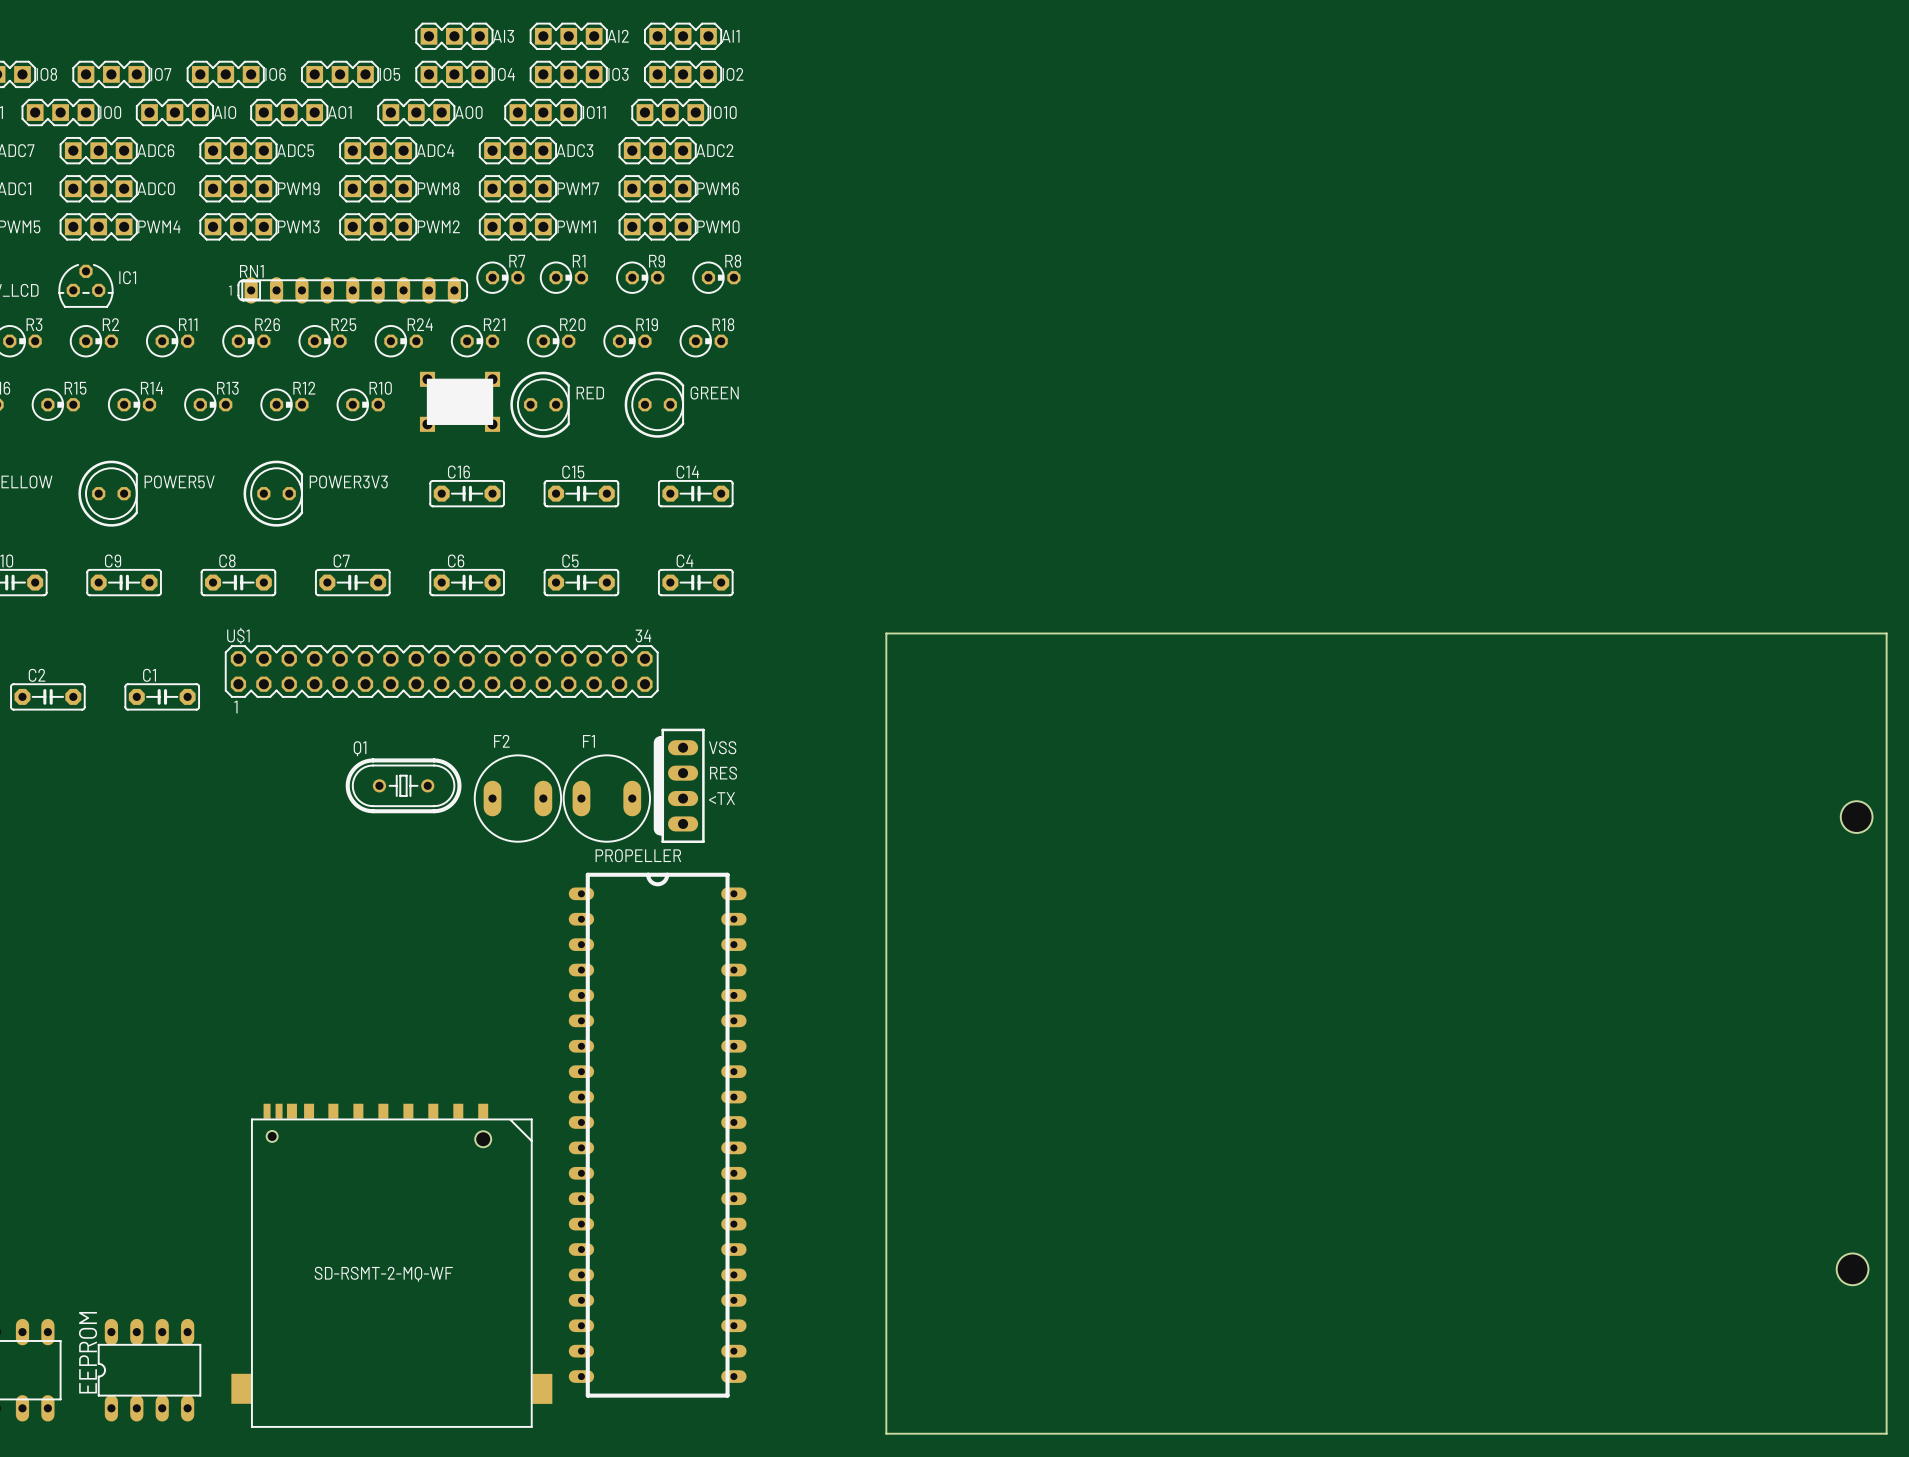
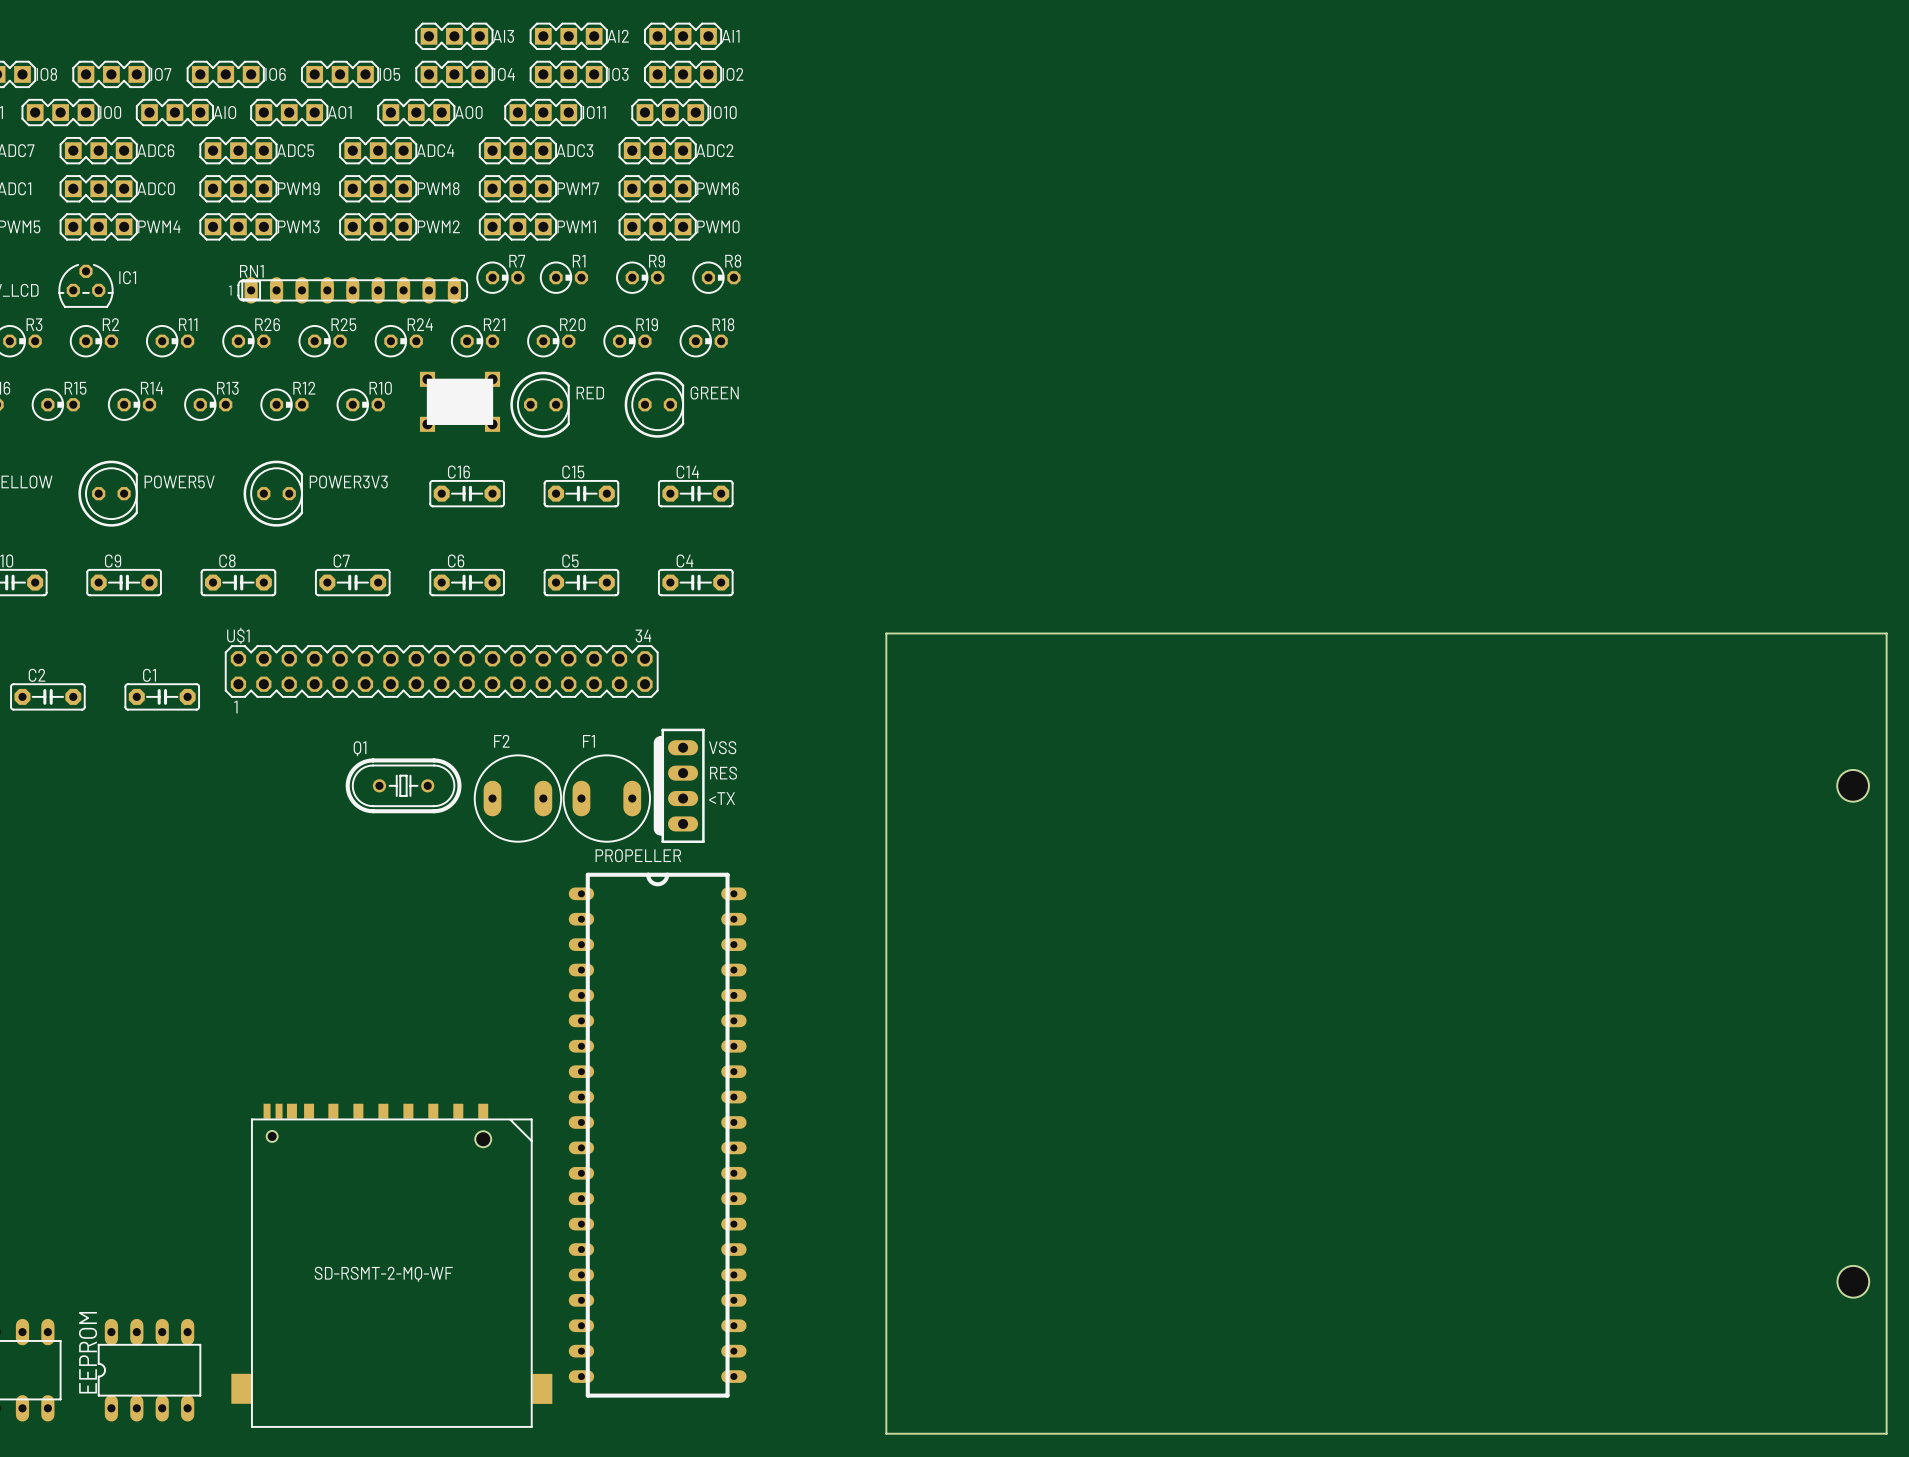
hole position: (1856, 817) -> (1853, 785)
hole position: (1852, 1269) -> (1853, 1281)

